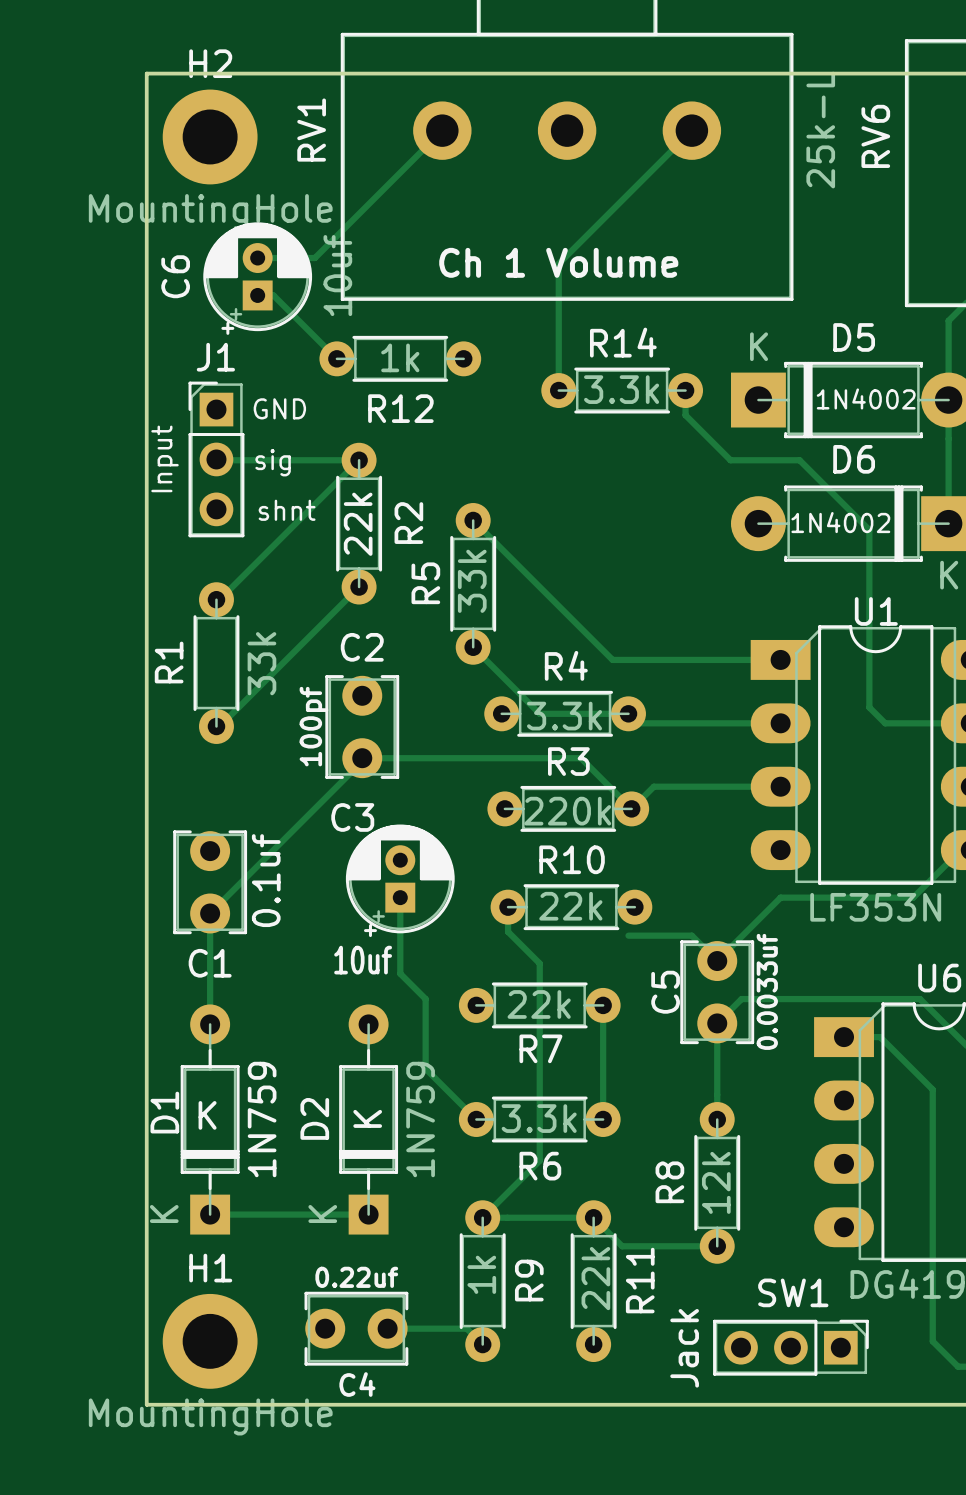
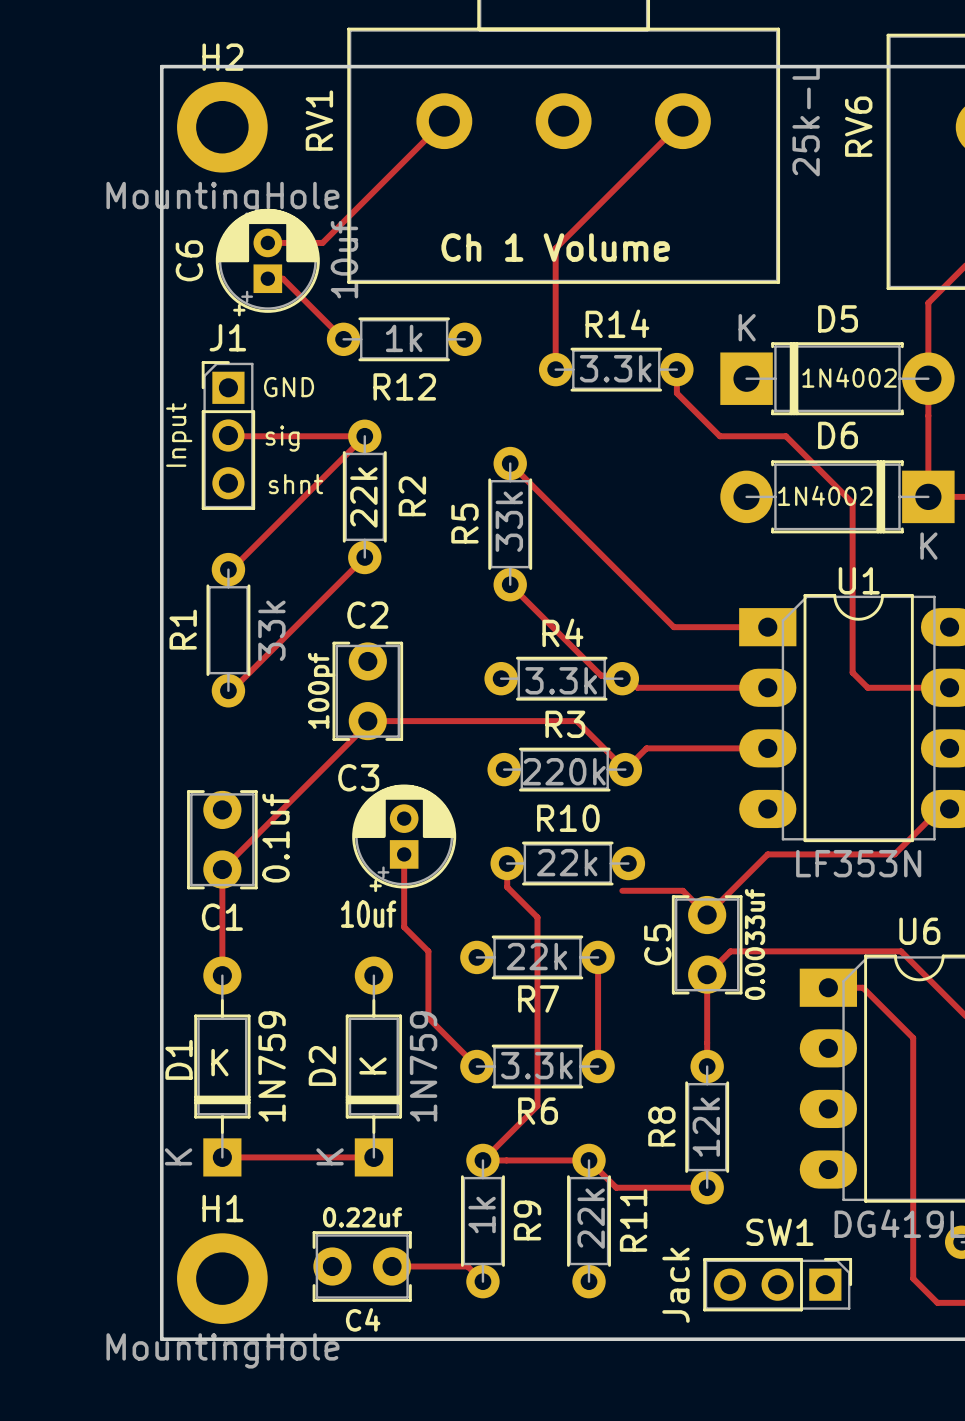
track: (473, 520) (612, 659) (682, 659) -> (510, 463) (673, 627)
R5 position: (473, 583) -> (510, 524)
track: (473, 647) (539, 713) (628, 713) (638, 723) (644, 723) -> (510, 584) (601, 675) (625, 675) (637, 687)

